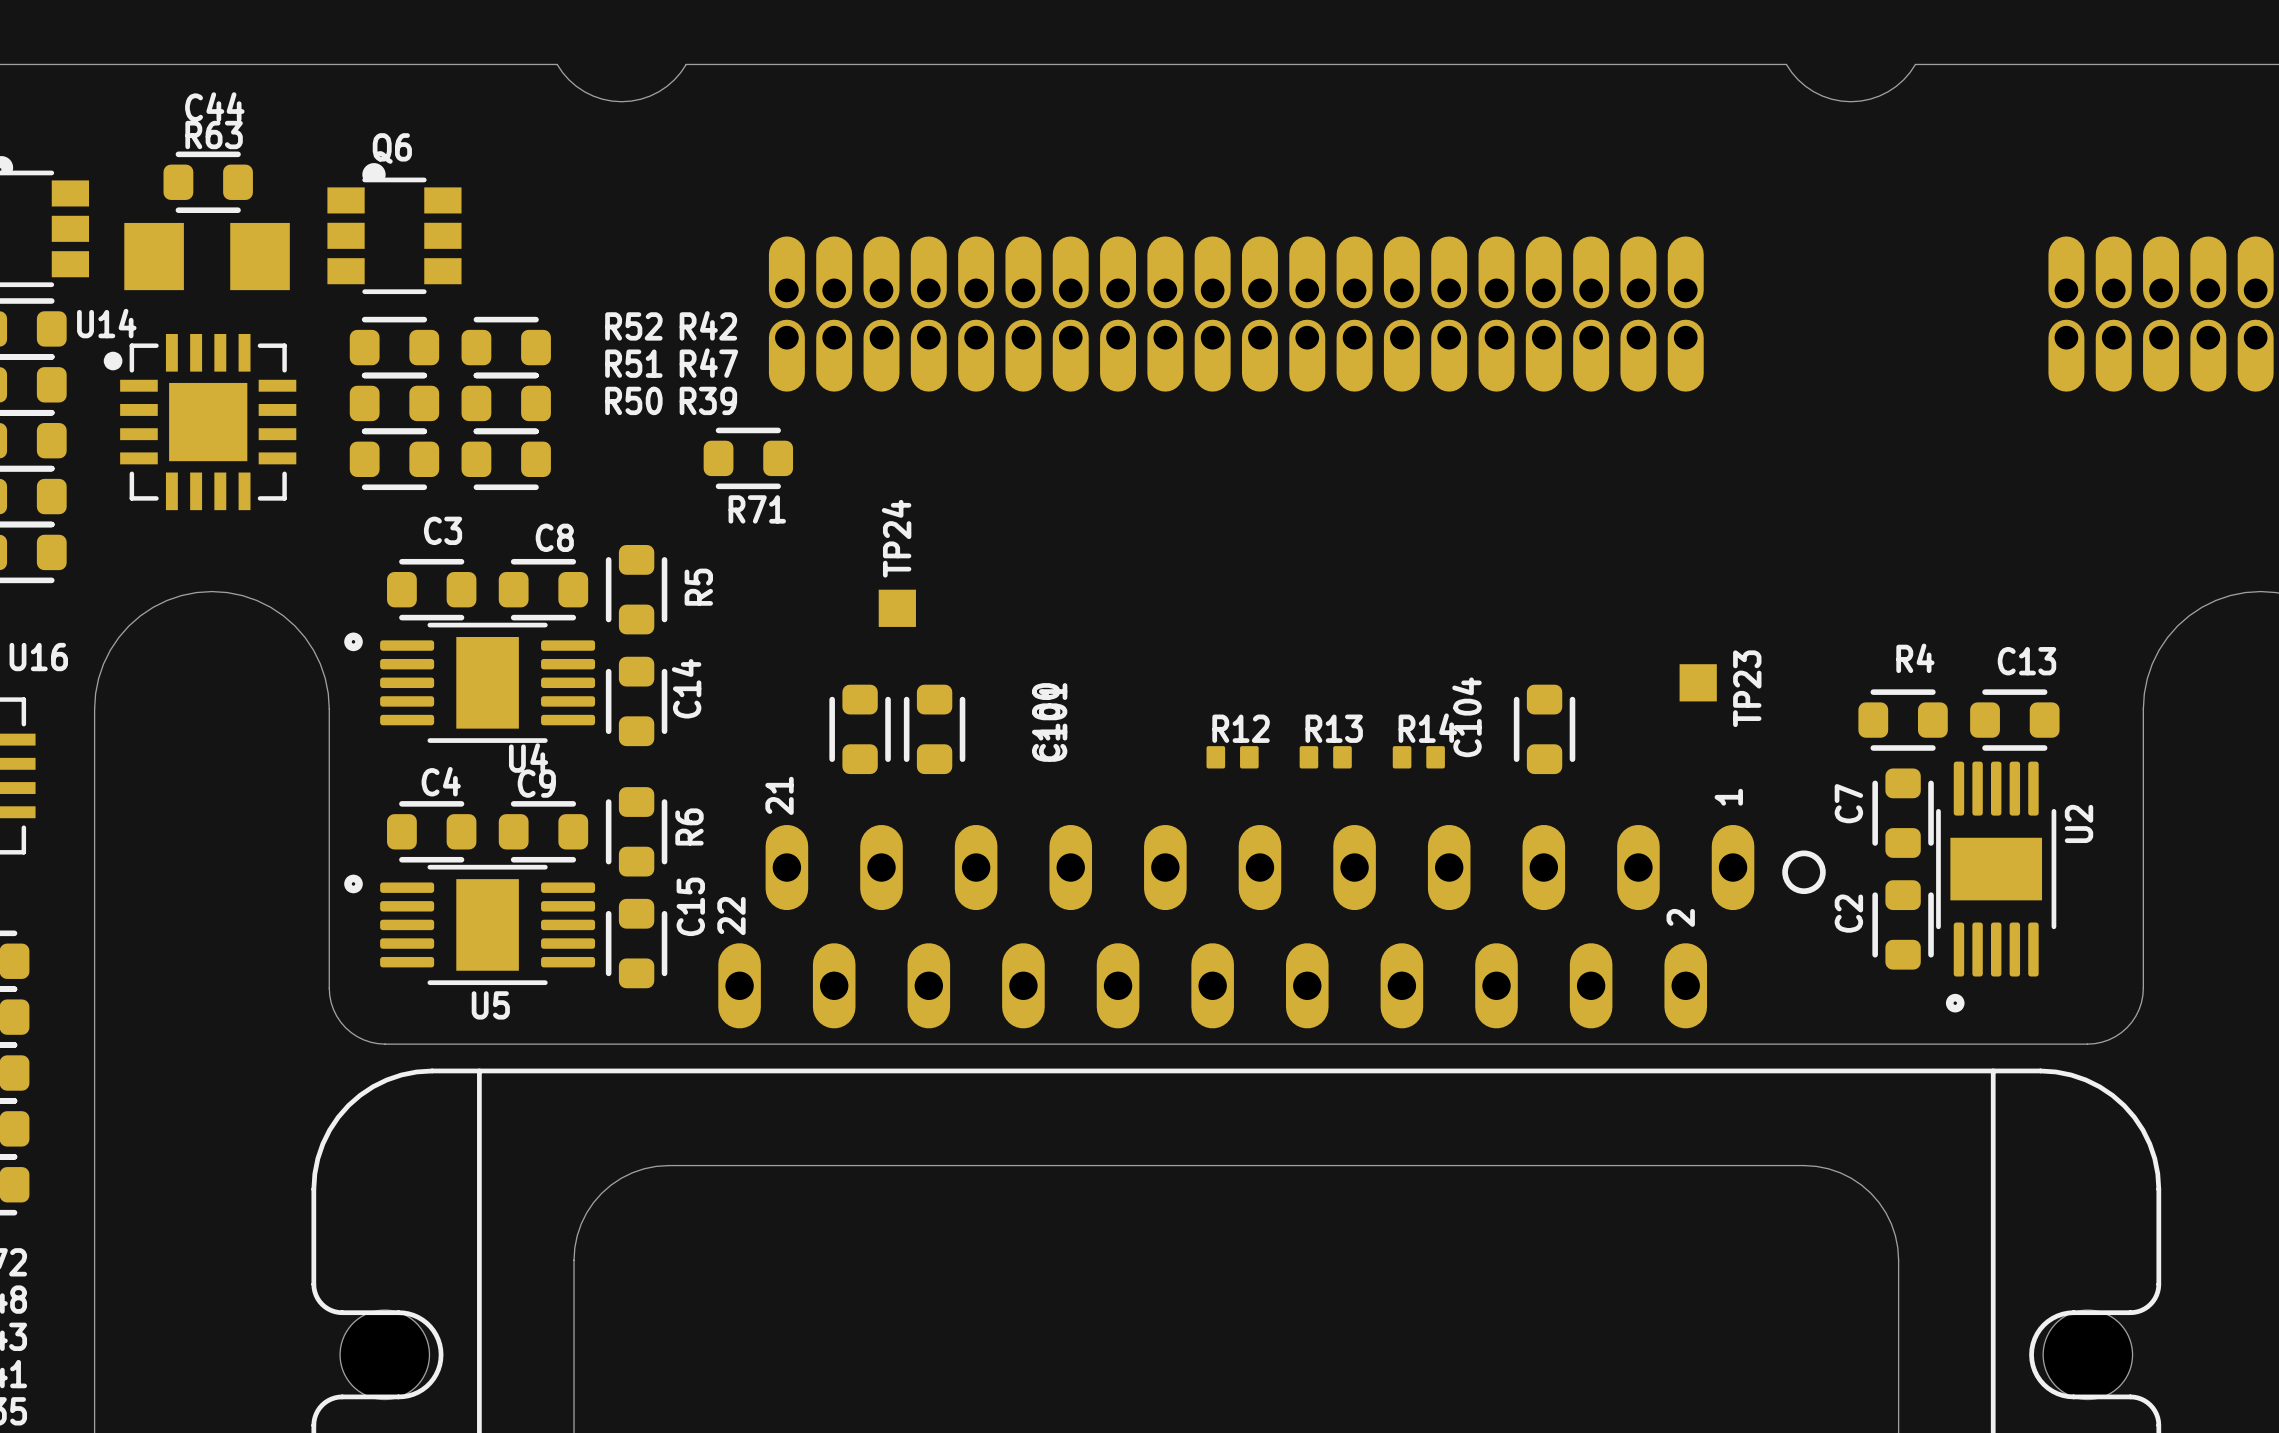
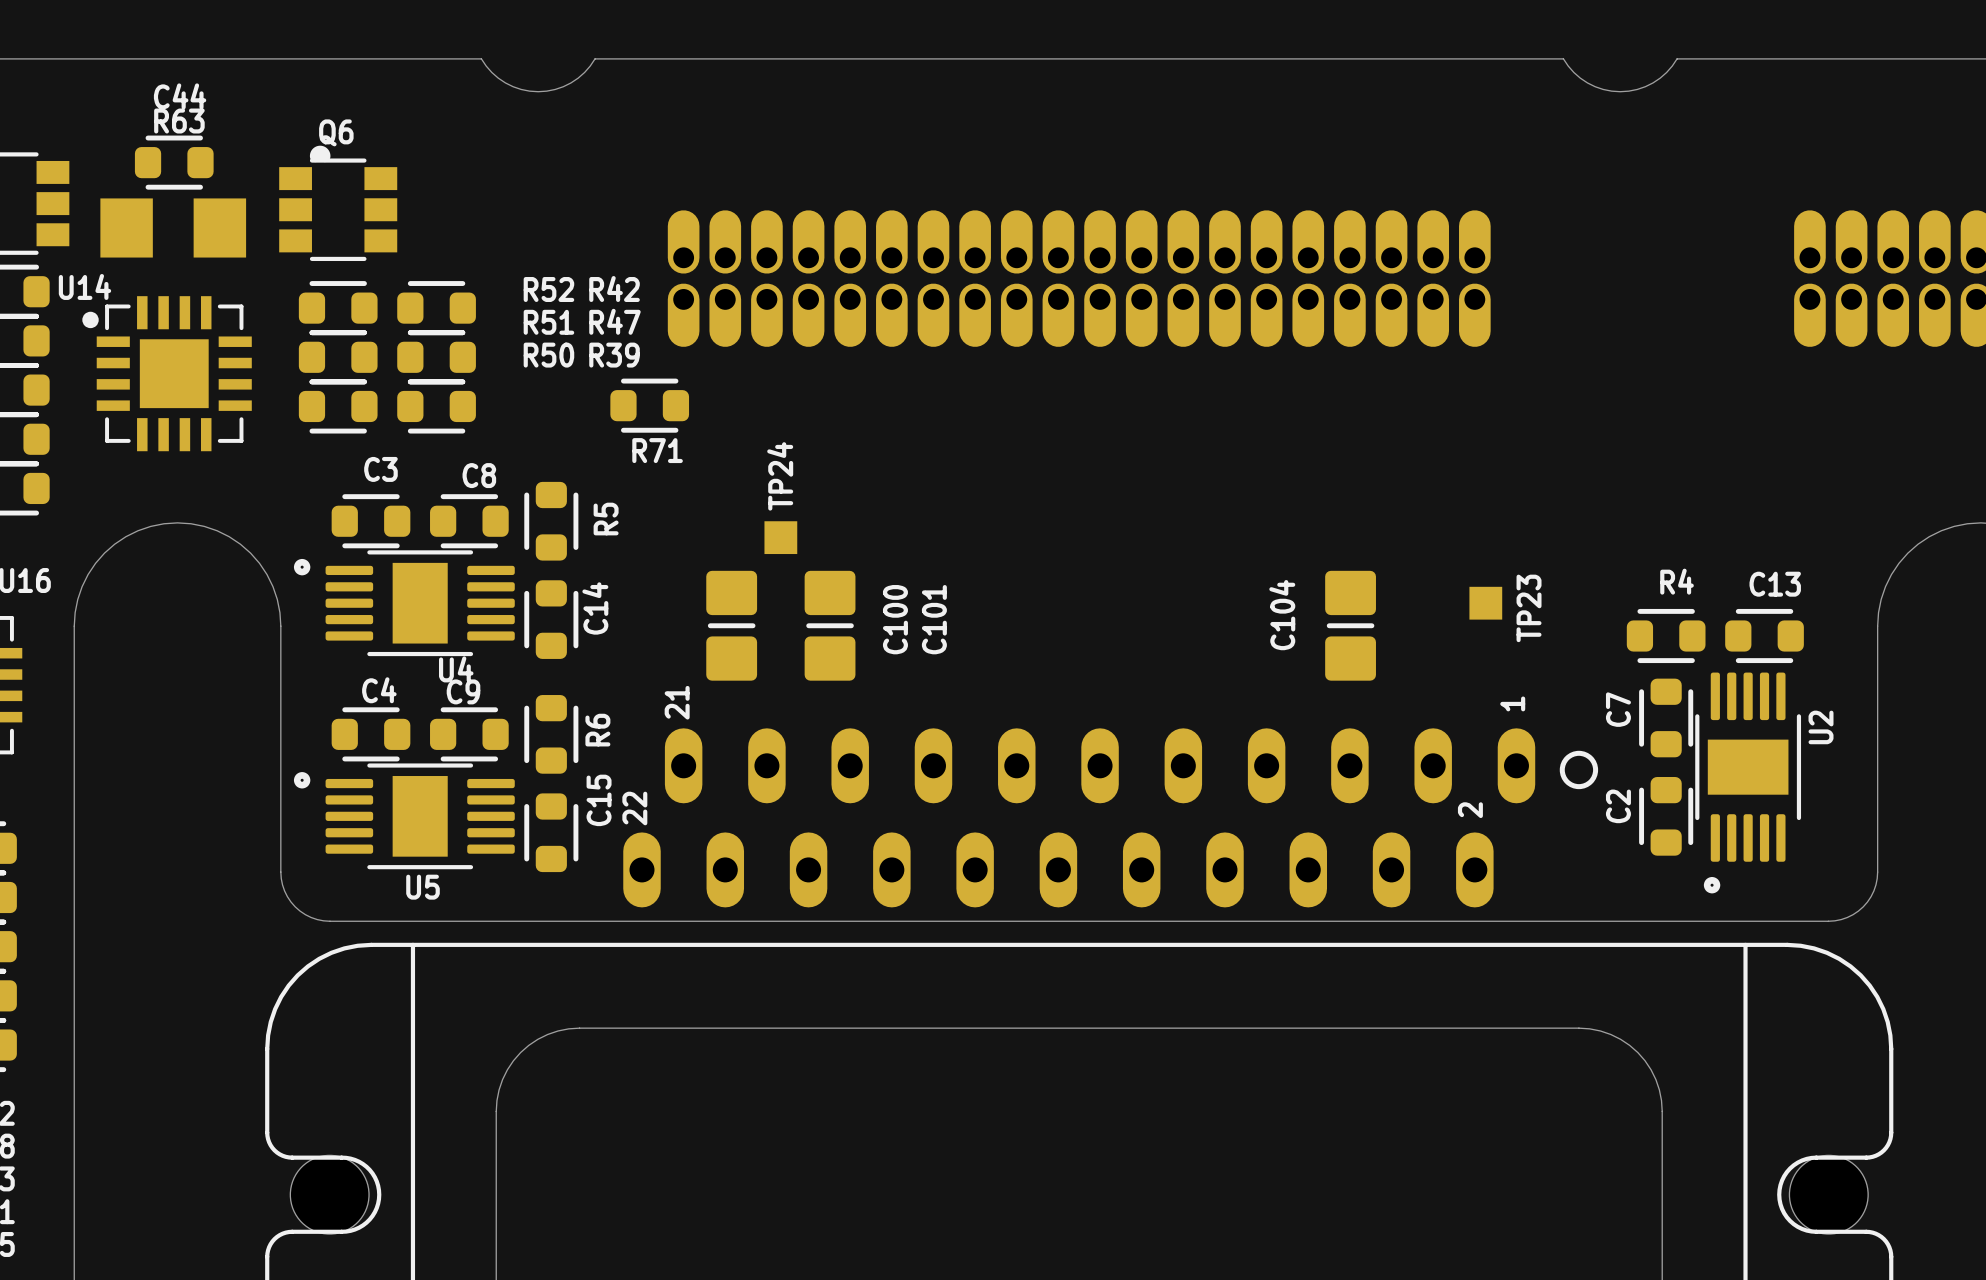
C100 footprint: [829, 684, 891, 775] -> [706, 570, 758, 681]
C101 footprint: [903, 684, 966, 775] -> [804, 570, 856, 681]
C104 footprint: [1513, 684, 1576, 775] -> [1325, 570, 1376, 681]
R12: (1232, 757) -> none
R13: (1325, 757) -> none
R14: (1418, 757) -> none

